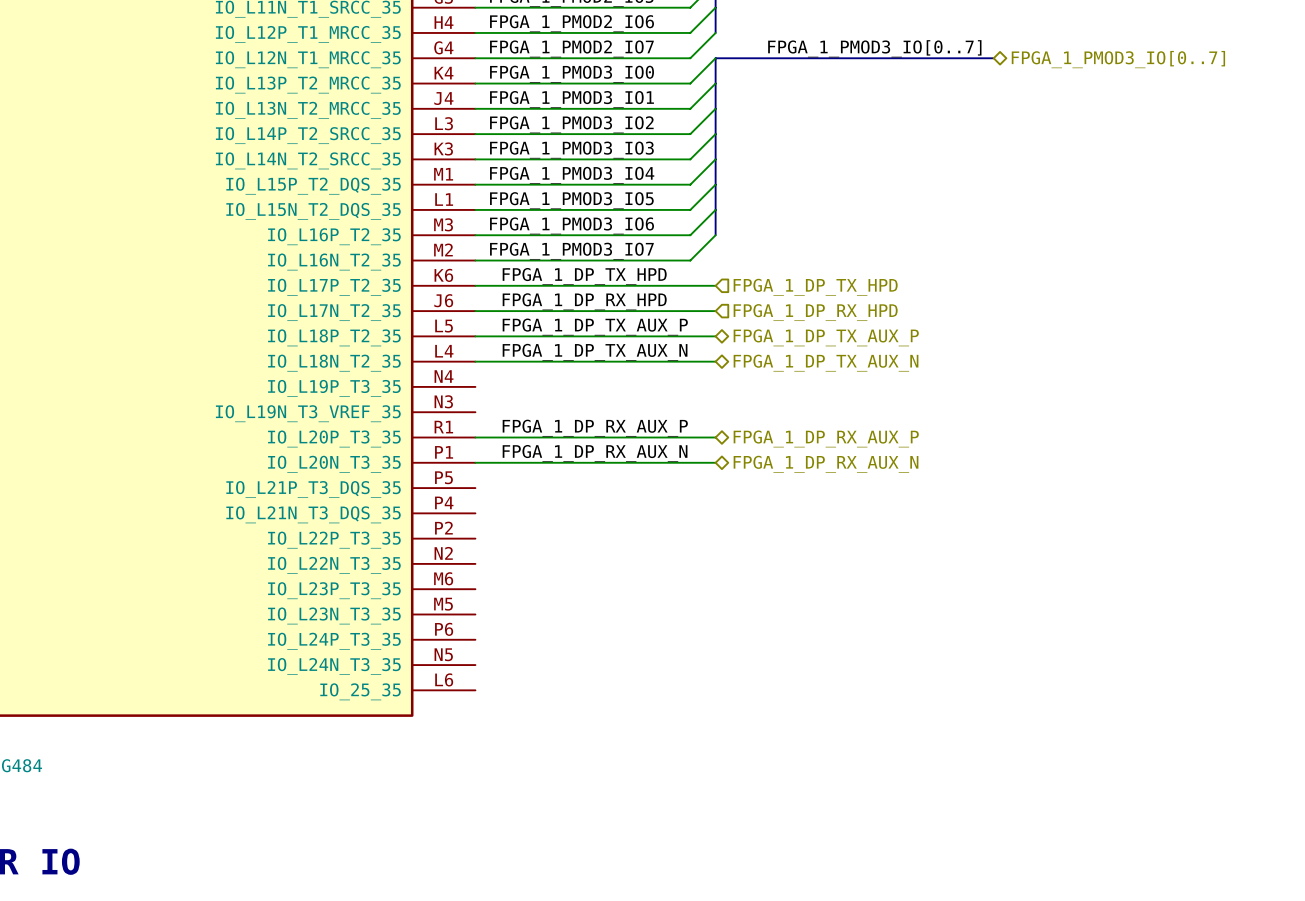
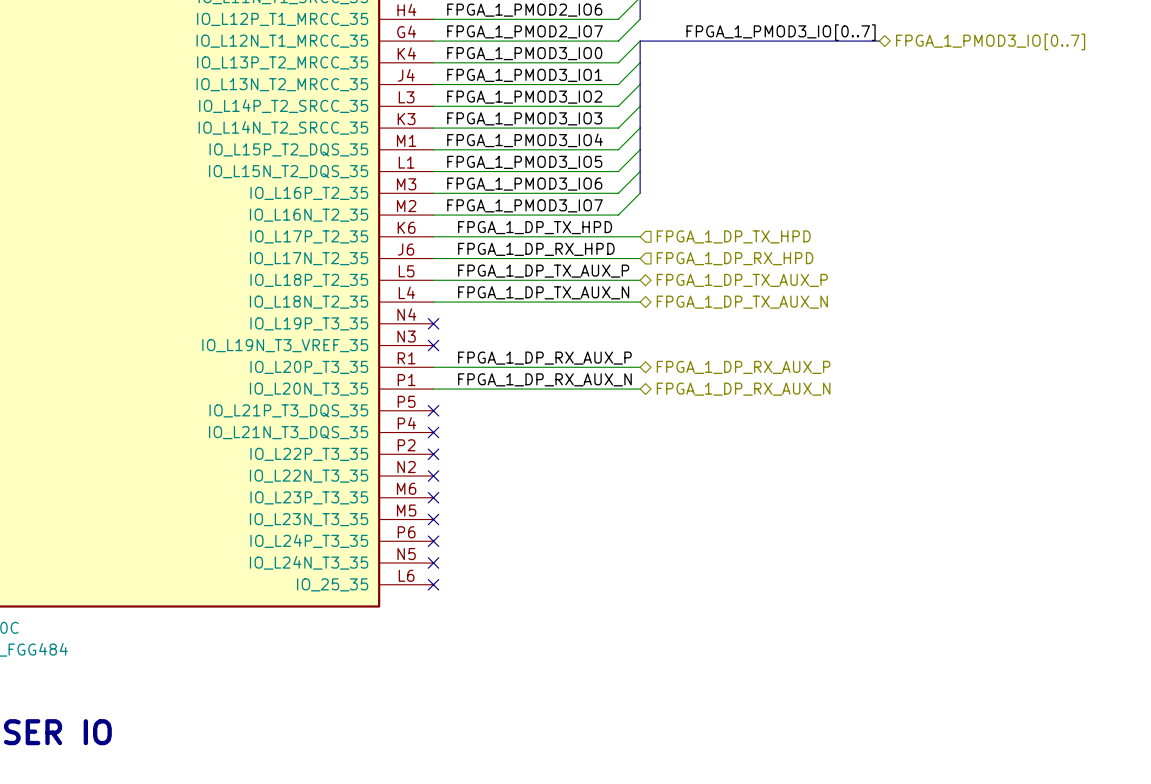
no-connect mark: none -> (433, 323)
no-connect mark: none -> (433, 345)
no-connect mark: none -> (433, 410)
no-connect mark: none -> (433, 432)
no-connect mark: none -> (433, 454)
no-connect mark: none -> (433, 476)
no-connect mark: none -> (433, 497)
no-connect mark: none -> (433, 519)
no-connect mark: none -> (433, 541)
no-connect mark: none -> (433, 563)
no-connect mark: none -> (433, 584)

